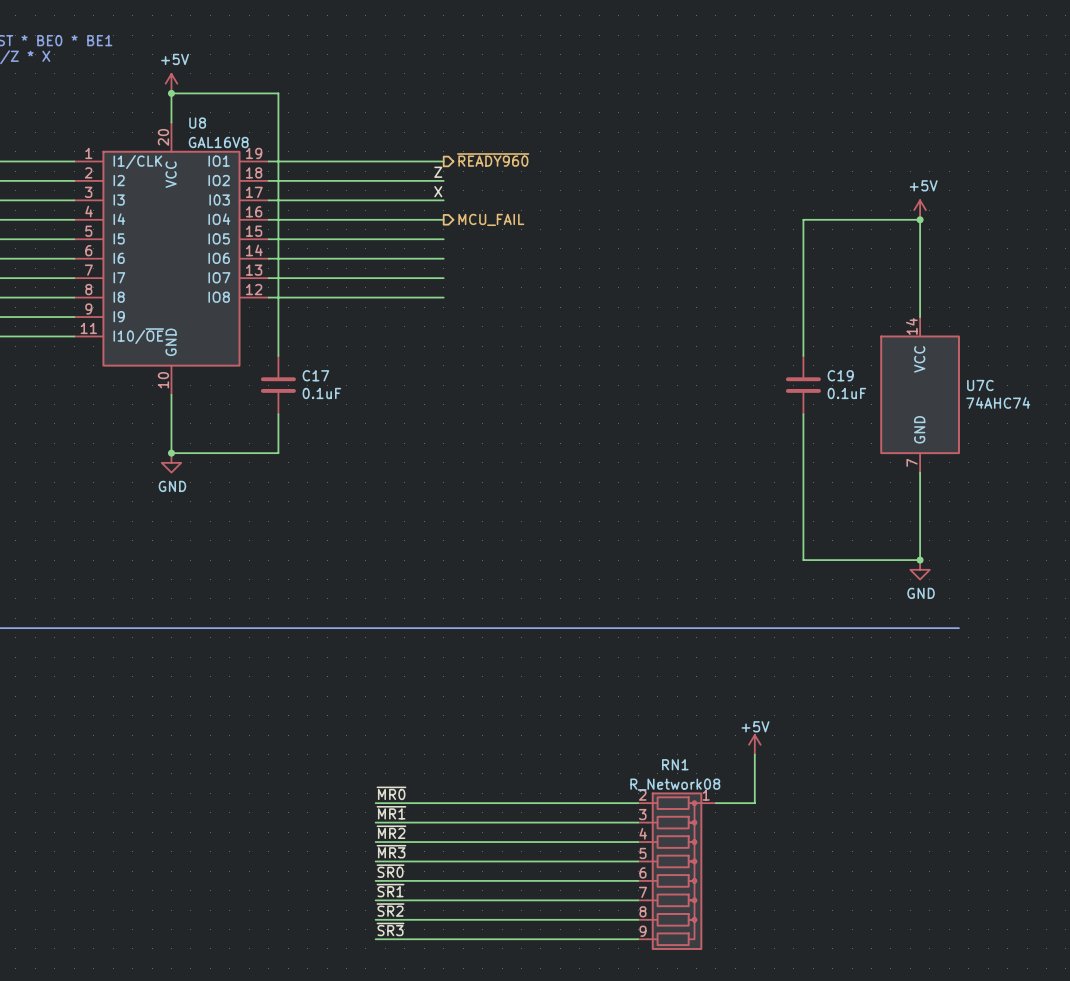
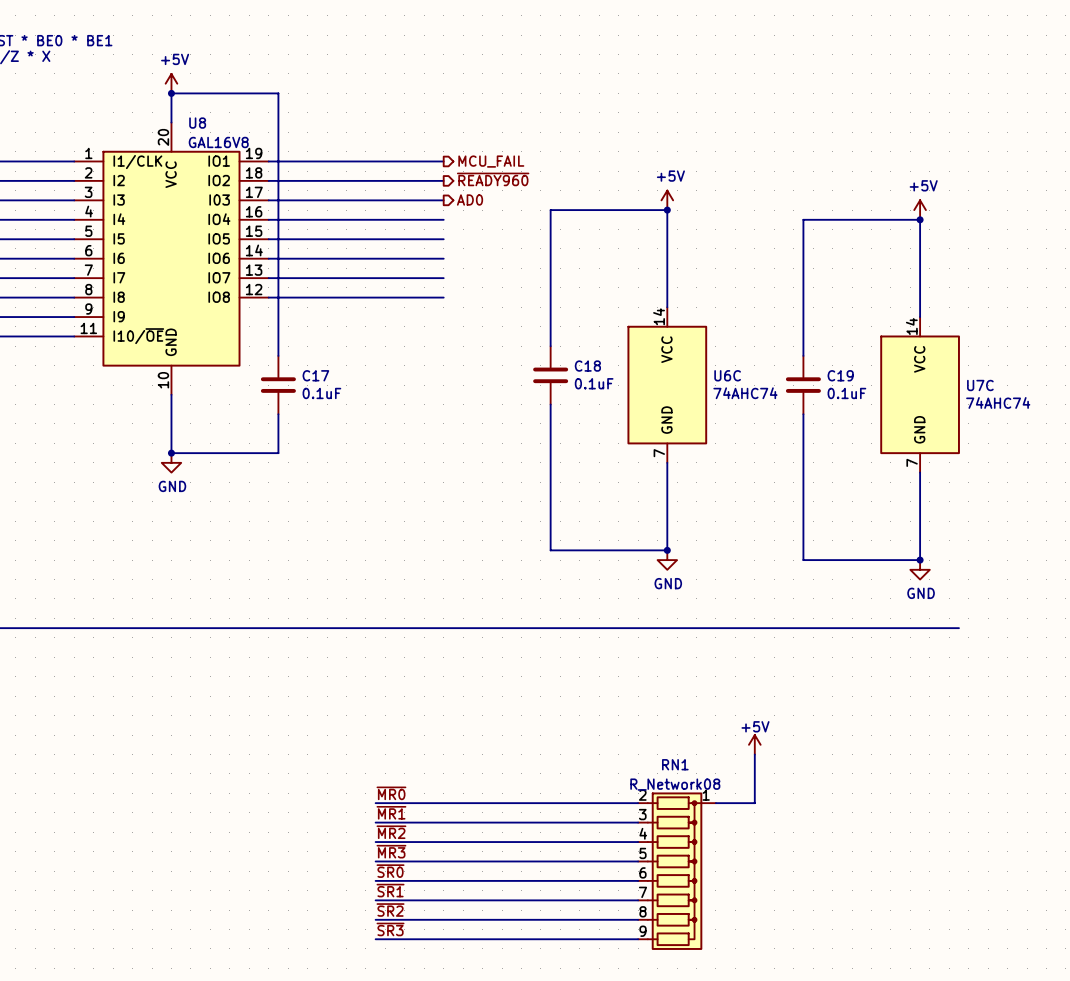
hierarchical label: ~{READY960} (493, 159) -> MCU_FAIL (491, 161)
label: Z (438, 172) -> none
hierarchical label: none -> ~{READY960} (493, 179)
label: X (438, 191) -> none
hierarchical label: none -> AD0 (470, 200)
power symbol: none -> +5V (667, 200)
junction: none -> (667, 210)
hierarchical label: MCU_FAIL (491, 219) -> none
wire: none -> (667, 307) (667, 210) (550, 210) (550, 346)
C18: none -> 0.1uF (550, 375)
U6C: none -> 74AHC74 (667, 385)
wire: none -> (550, 404) (550, 550) (667, 550) (667, 462)
junction: none -> (667, 550)
power symbol: none -> GND (667, 560)

